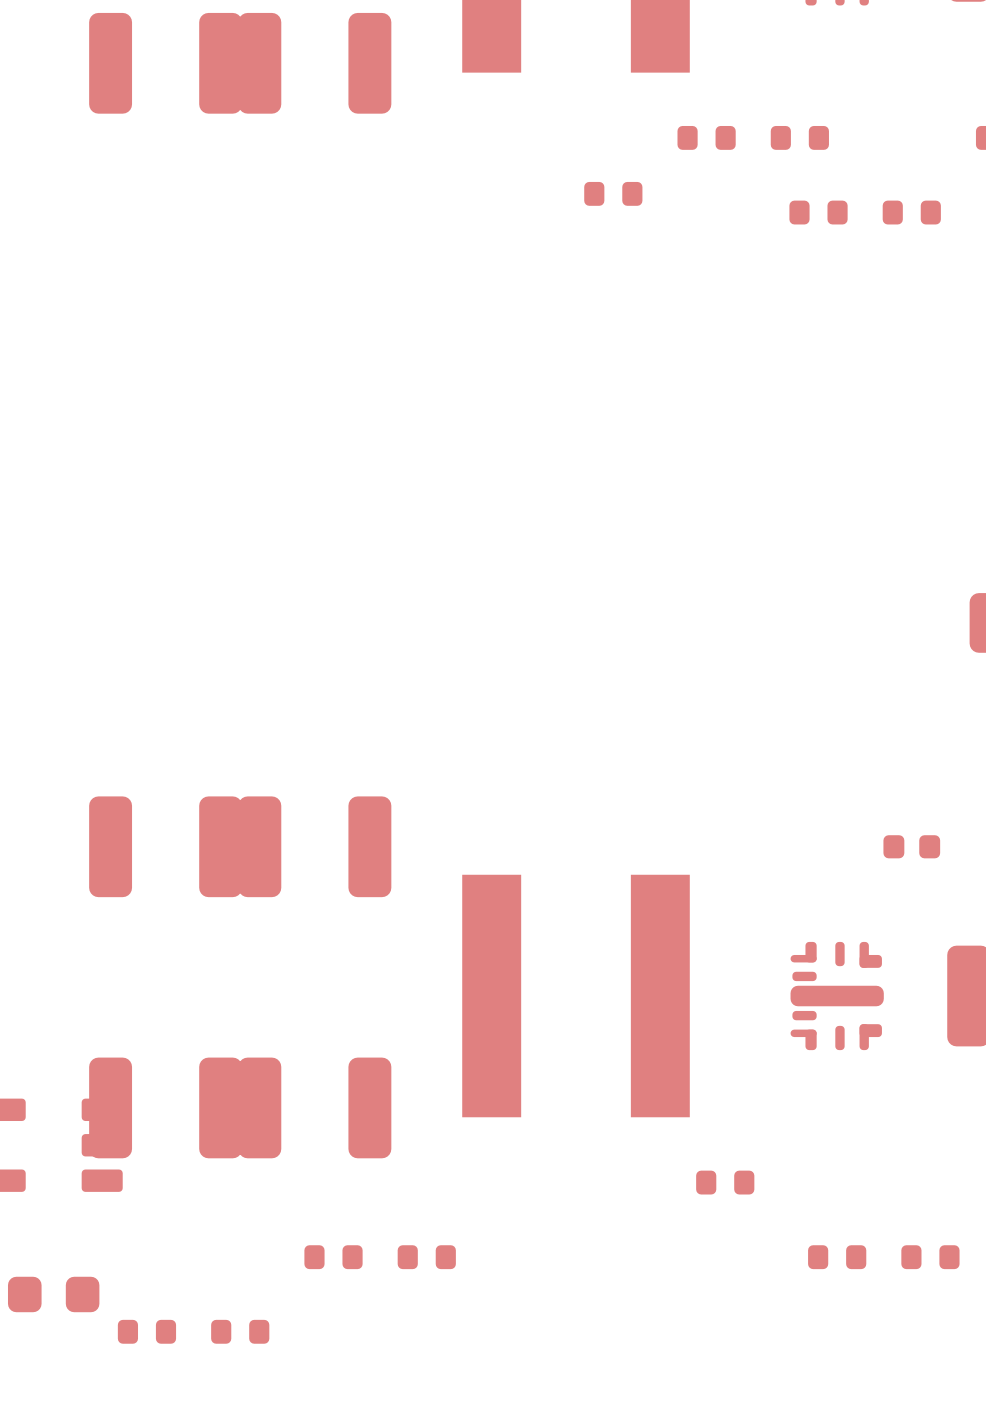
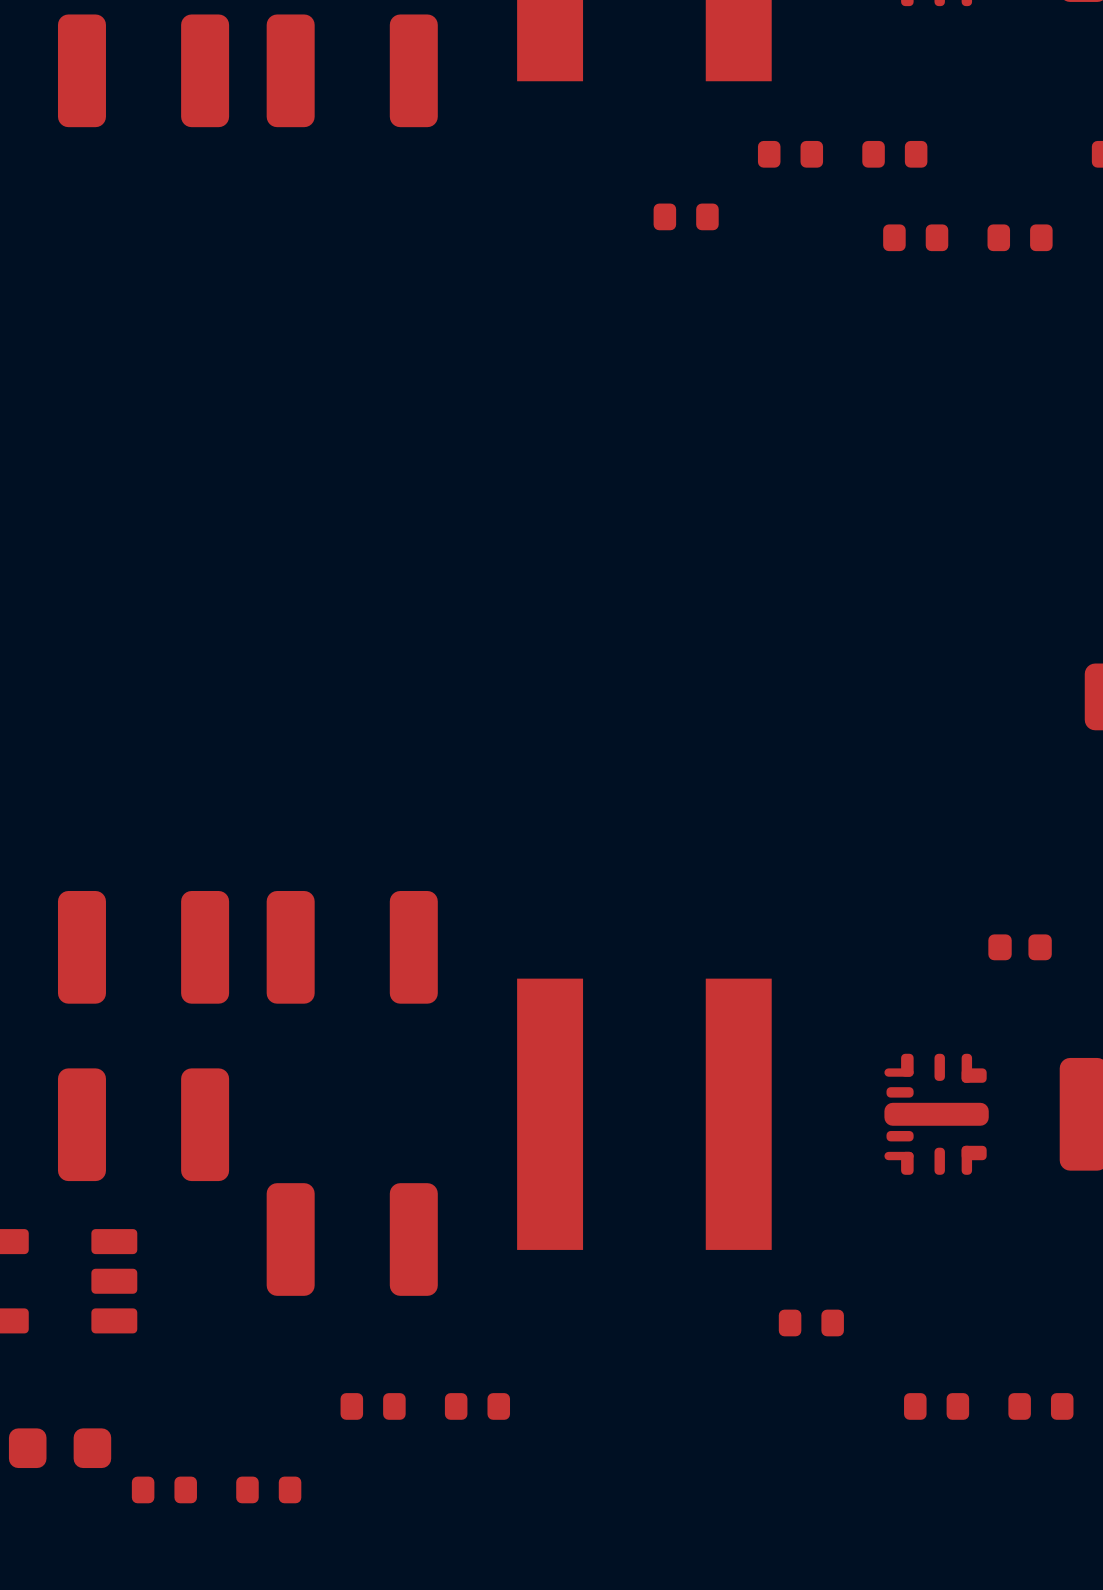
part position: (165, 63) -> (143, 70)
part position: (165, 846) -> (143, 947)
part position: (165, 1107) -> (143, 1124)

